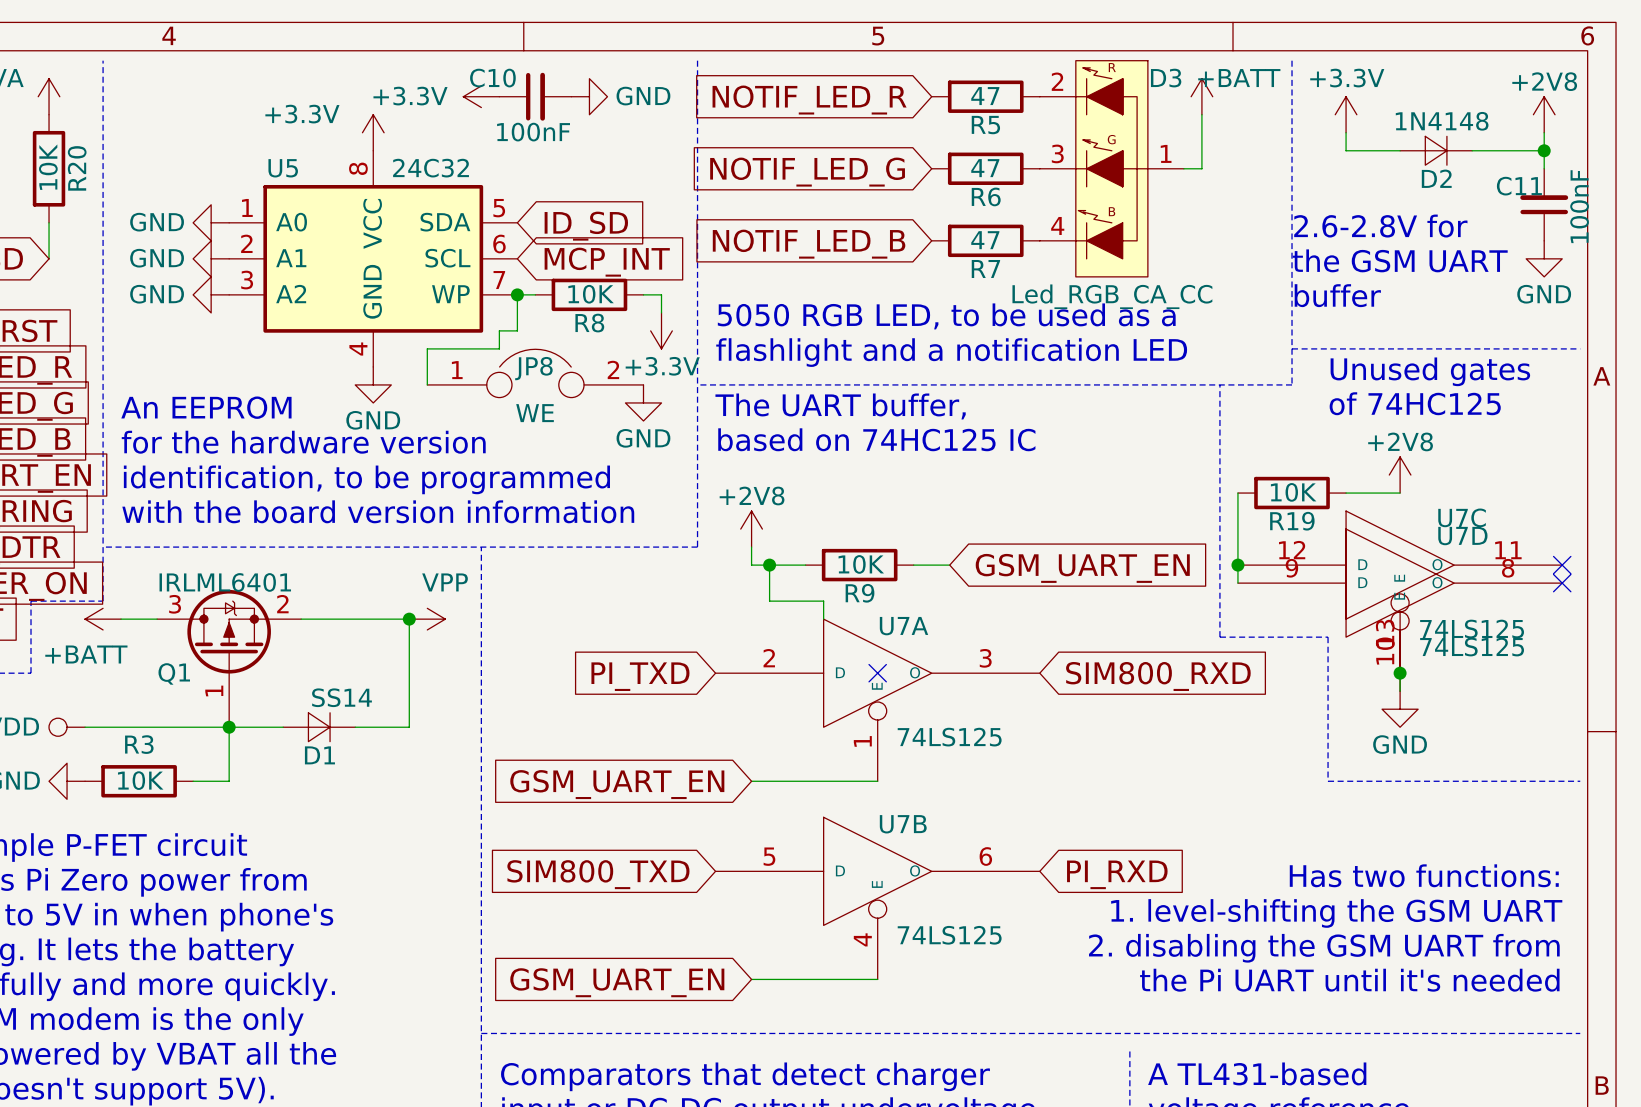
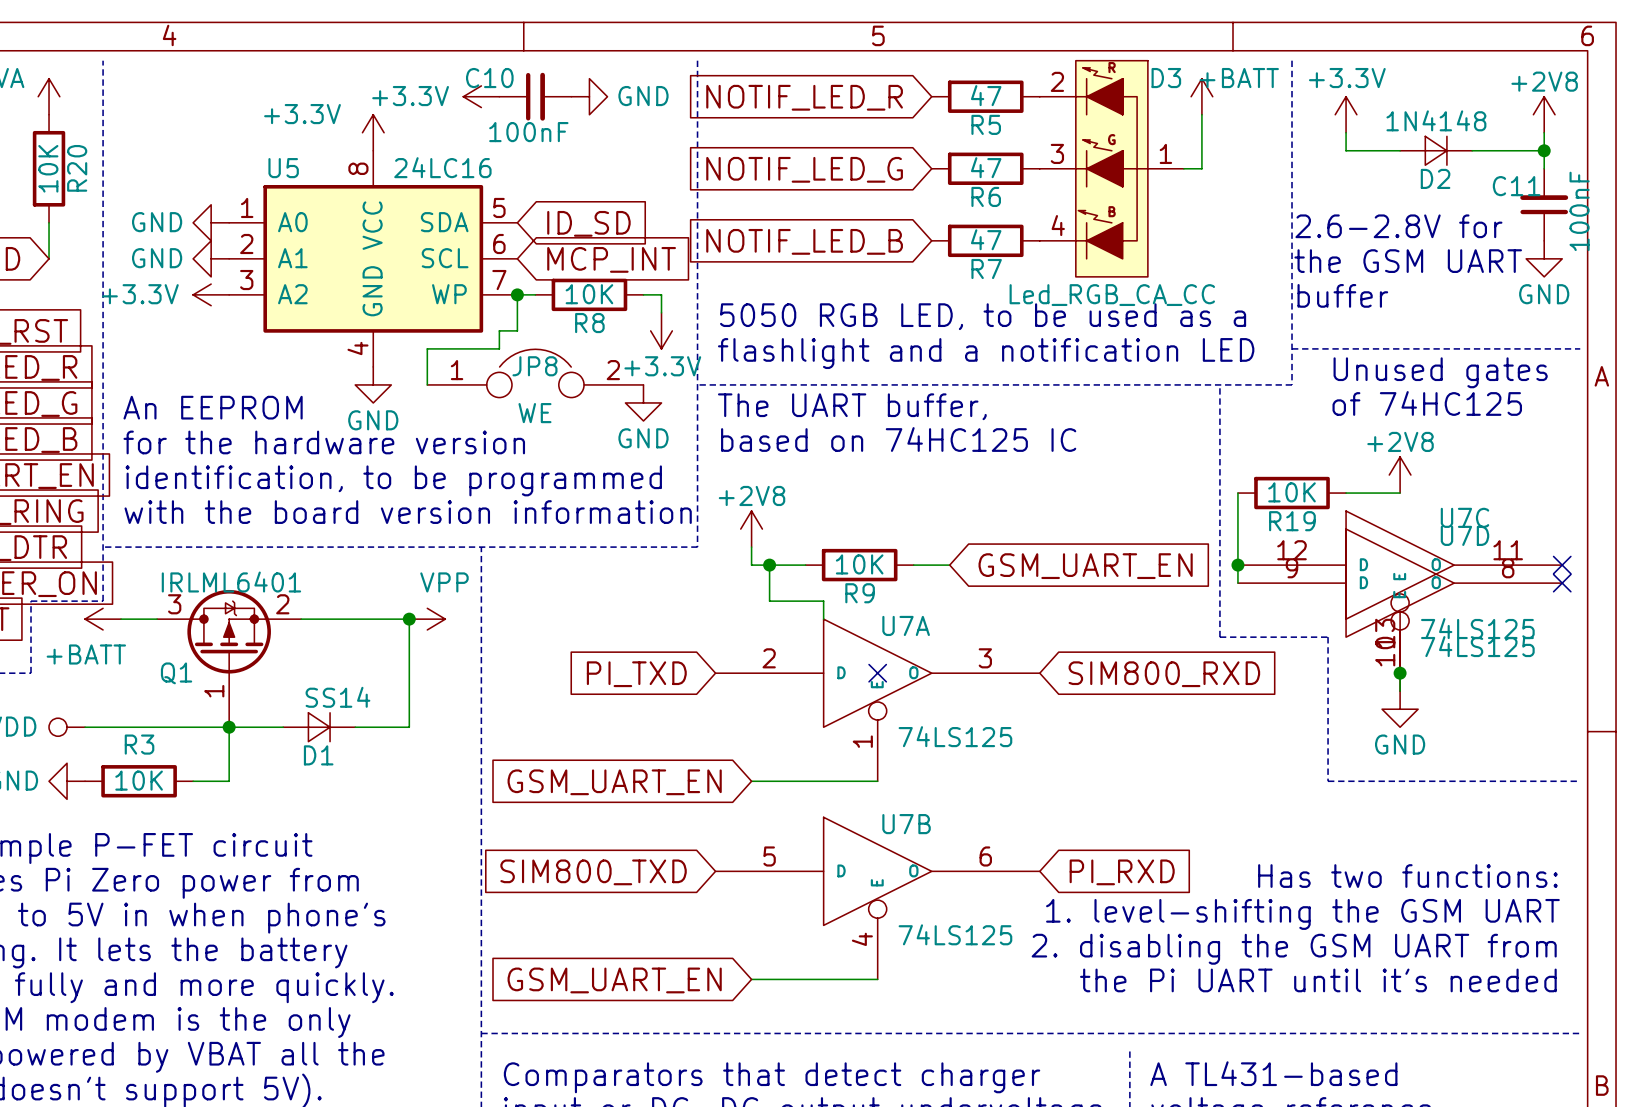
U5 value: 24C32 (431, 168) -> 24LC16 (442, 167)
power symbol: GND (211, 294) -> +3.3V (211, 294)

